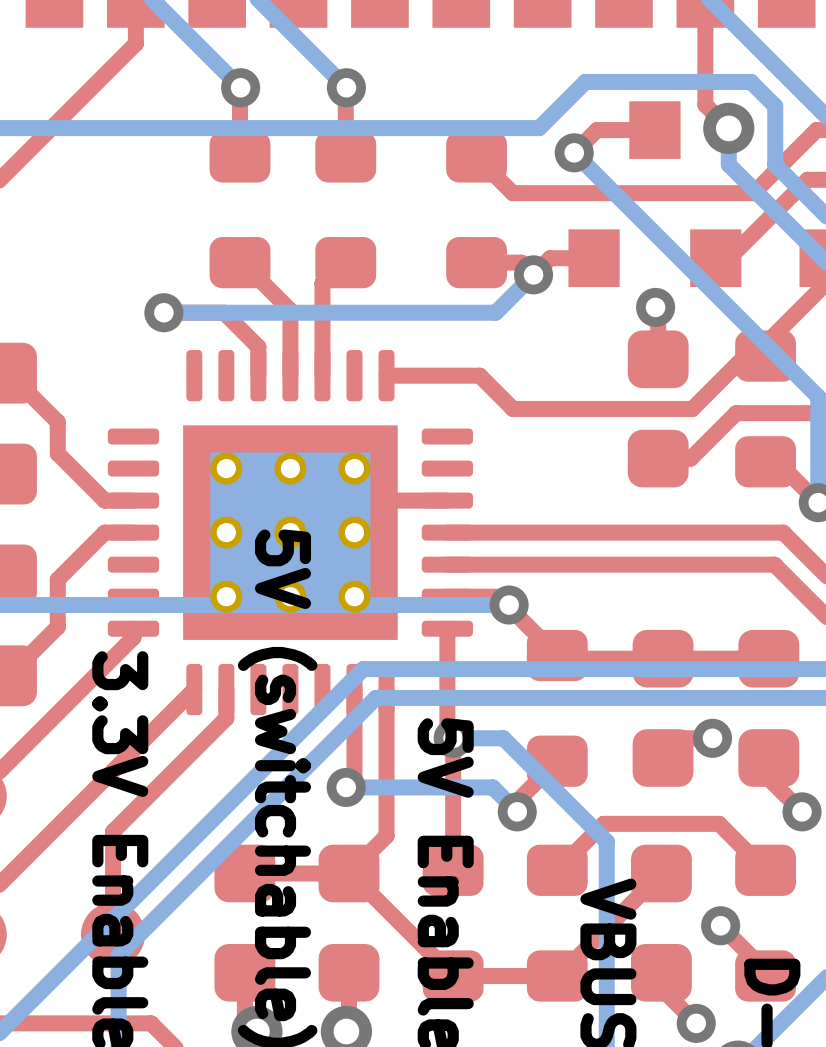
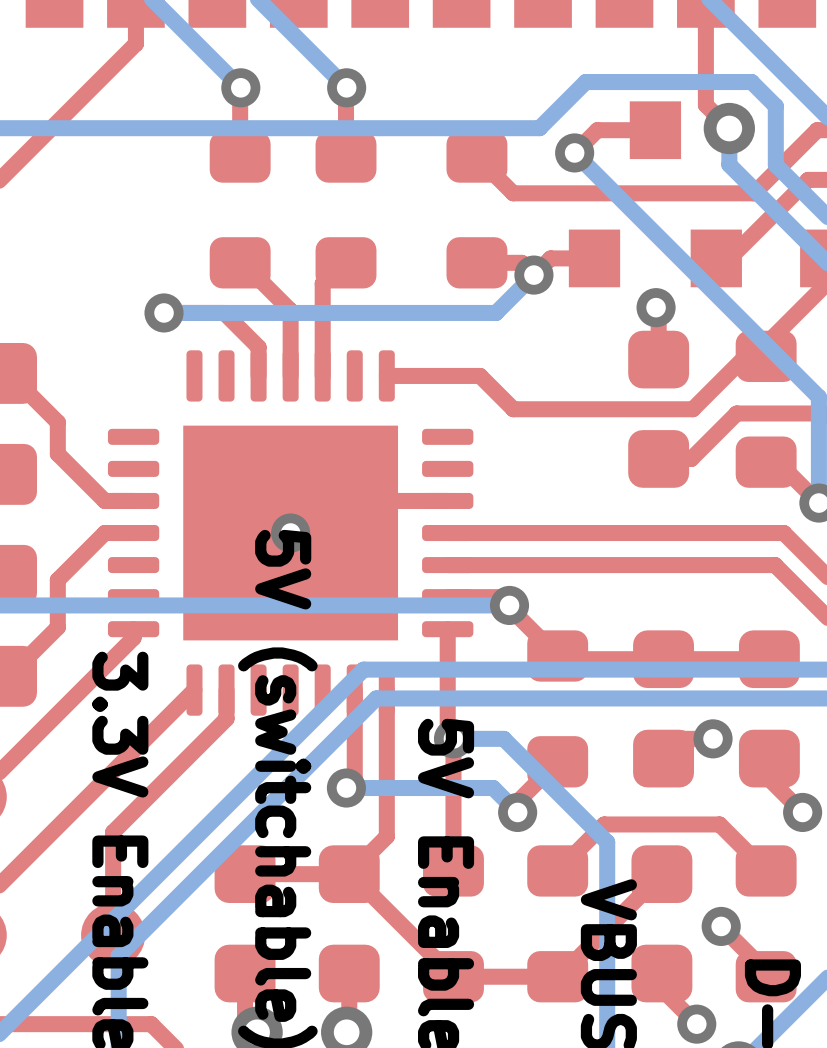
part footprint: [107, 350, 474, 716] -> [107, 350, 474, 716]
via: none -> (290, 533)

